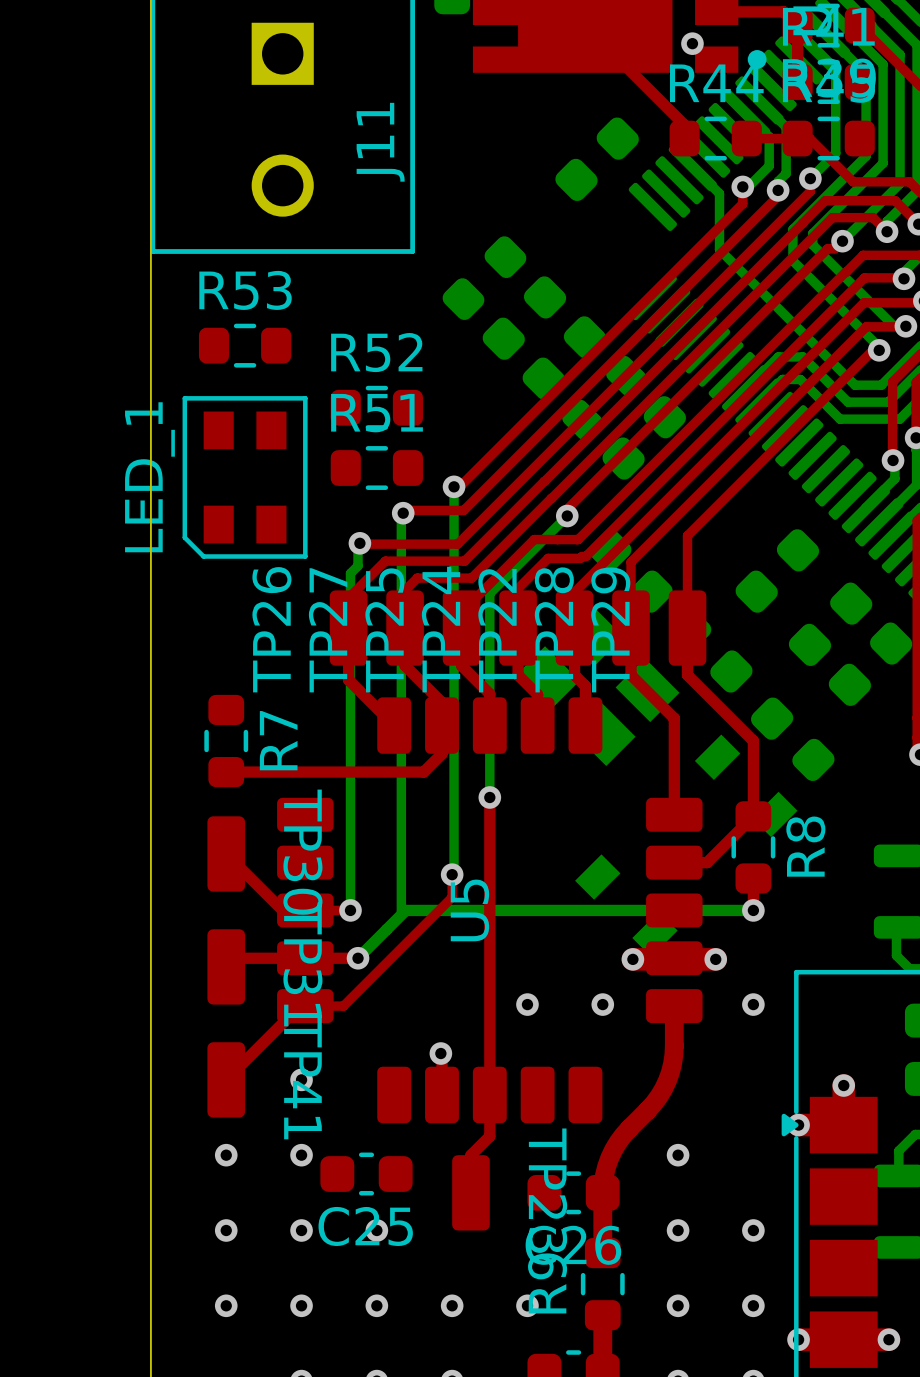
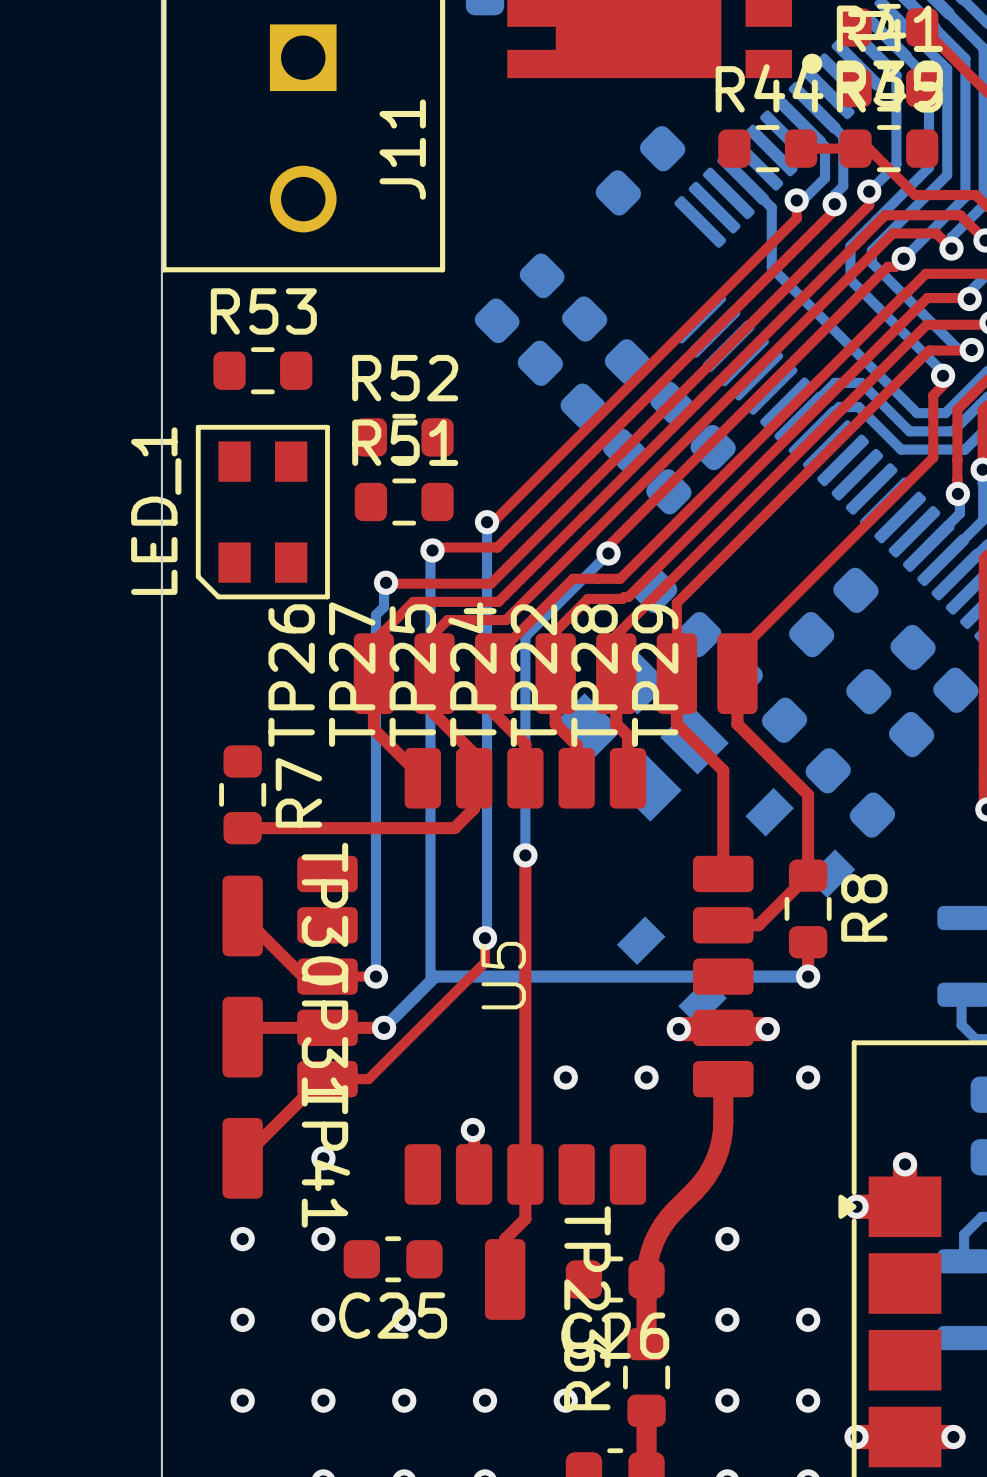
top track: (716, 11) (783, 11) (797, 25) (797, 82) -> none
top track: (595, 35) (684, 125) (684, 138) -> none
via: (692, 43) -> none
top track: (880, 351) (872, 351) (687, 535) (687, 609) -> (944, 376) (944, 384) (933, 395) (933, 457) (737, 653)

